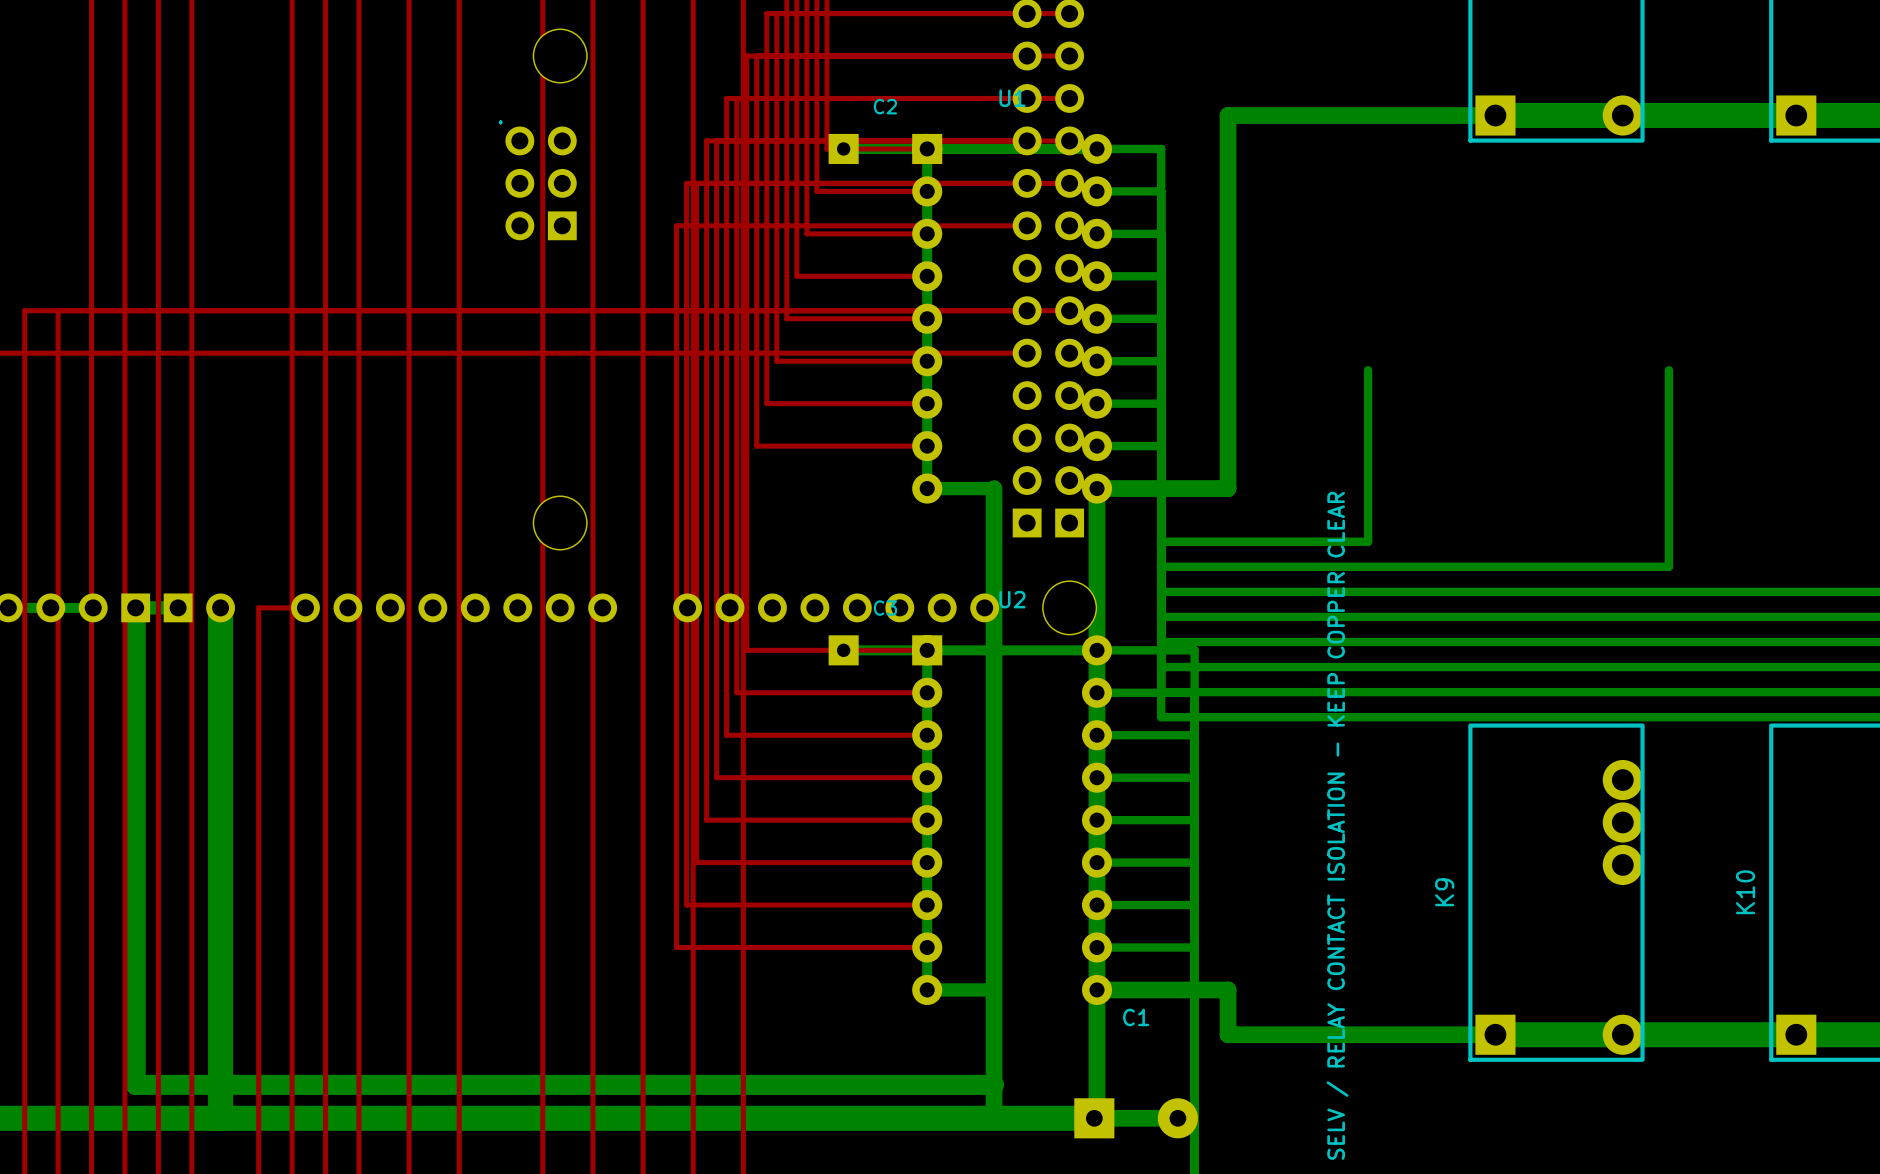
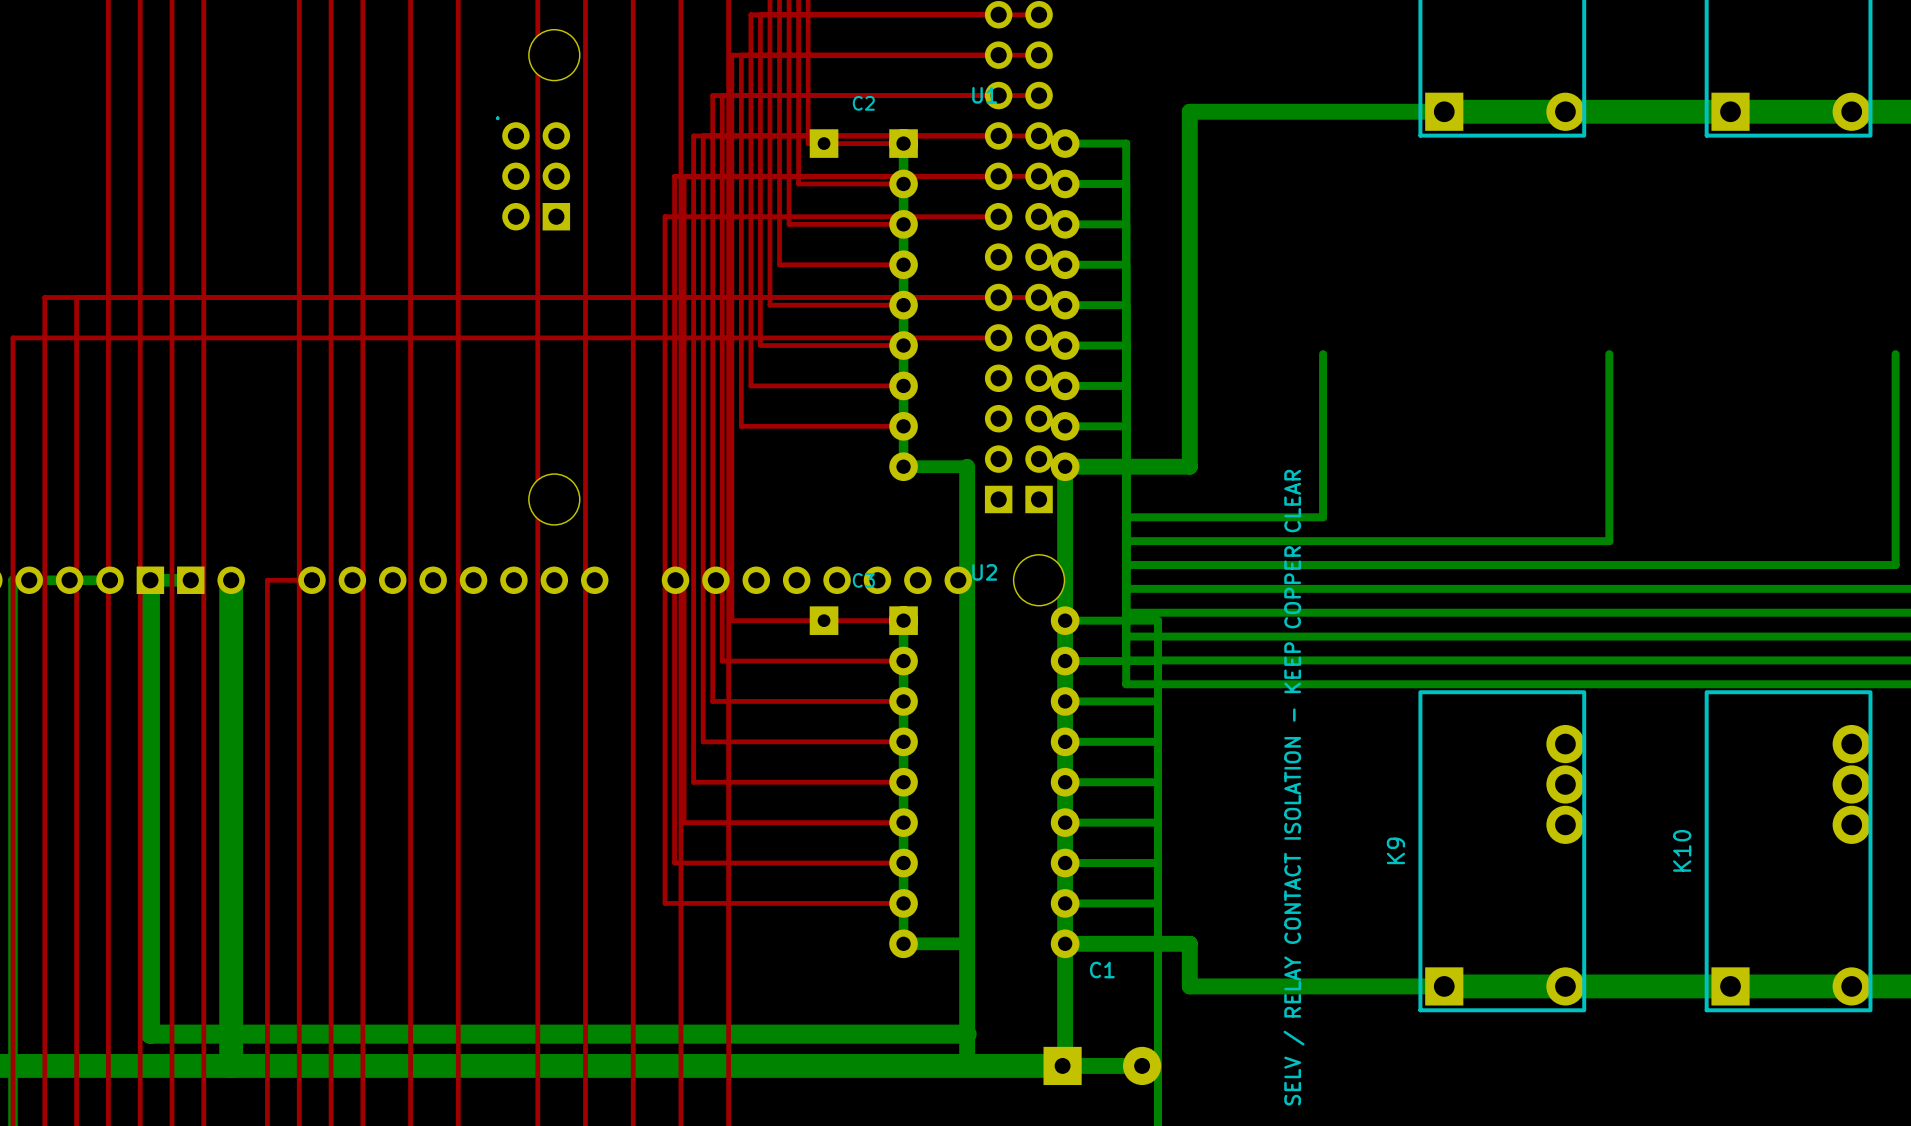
bottom track: (843, 148) (1097, 148) -> none
bottom track: (843, 650) (1097, 650) -> none

